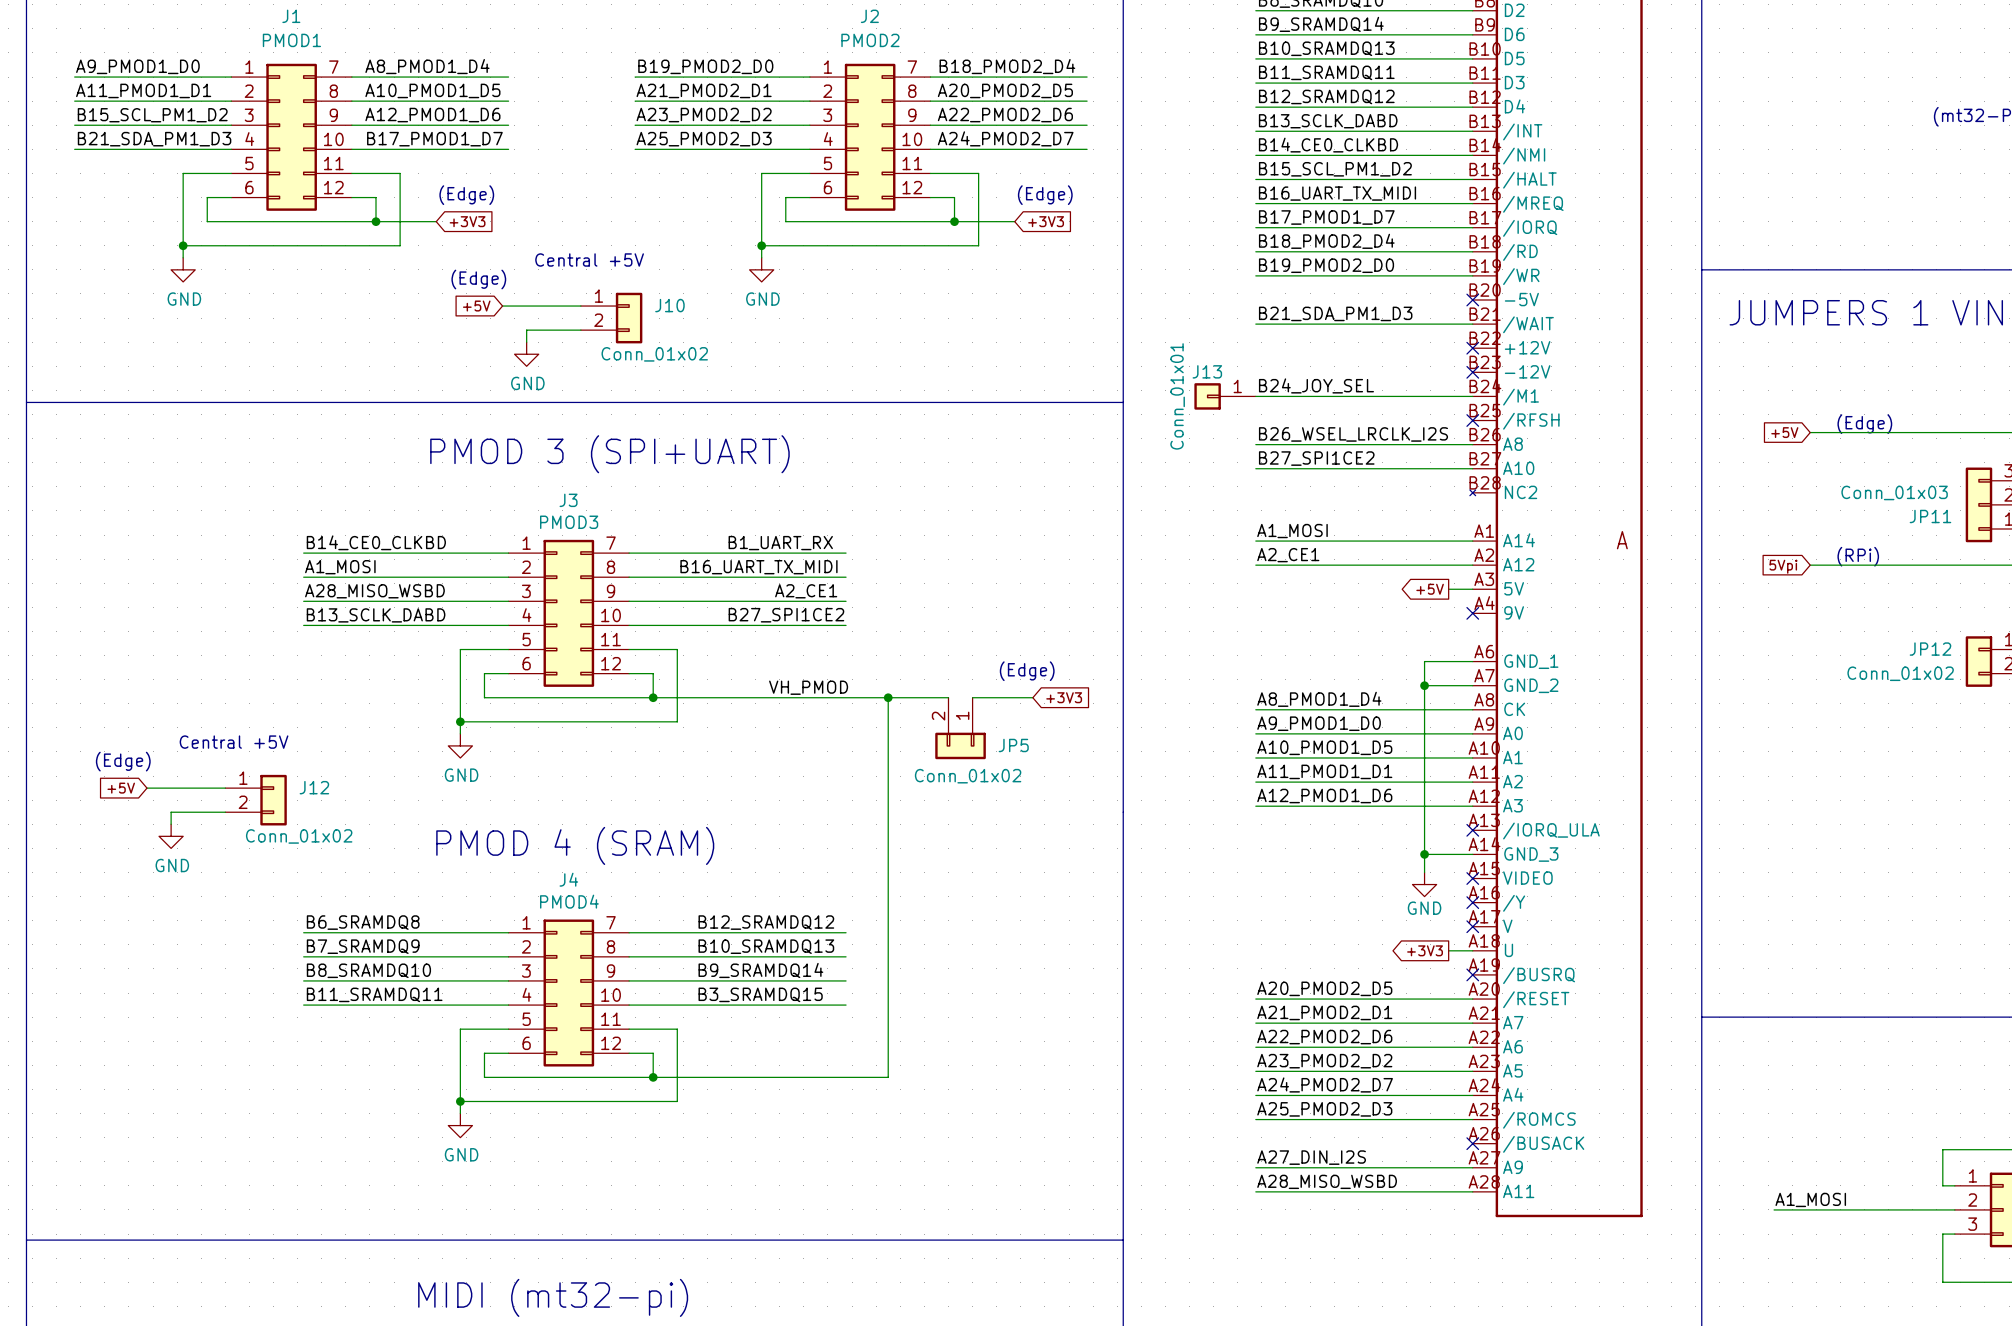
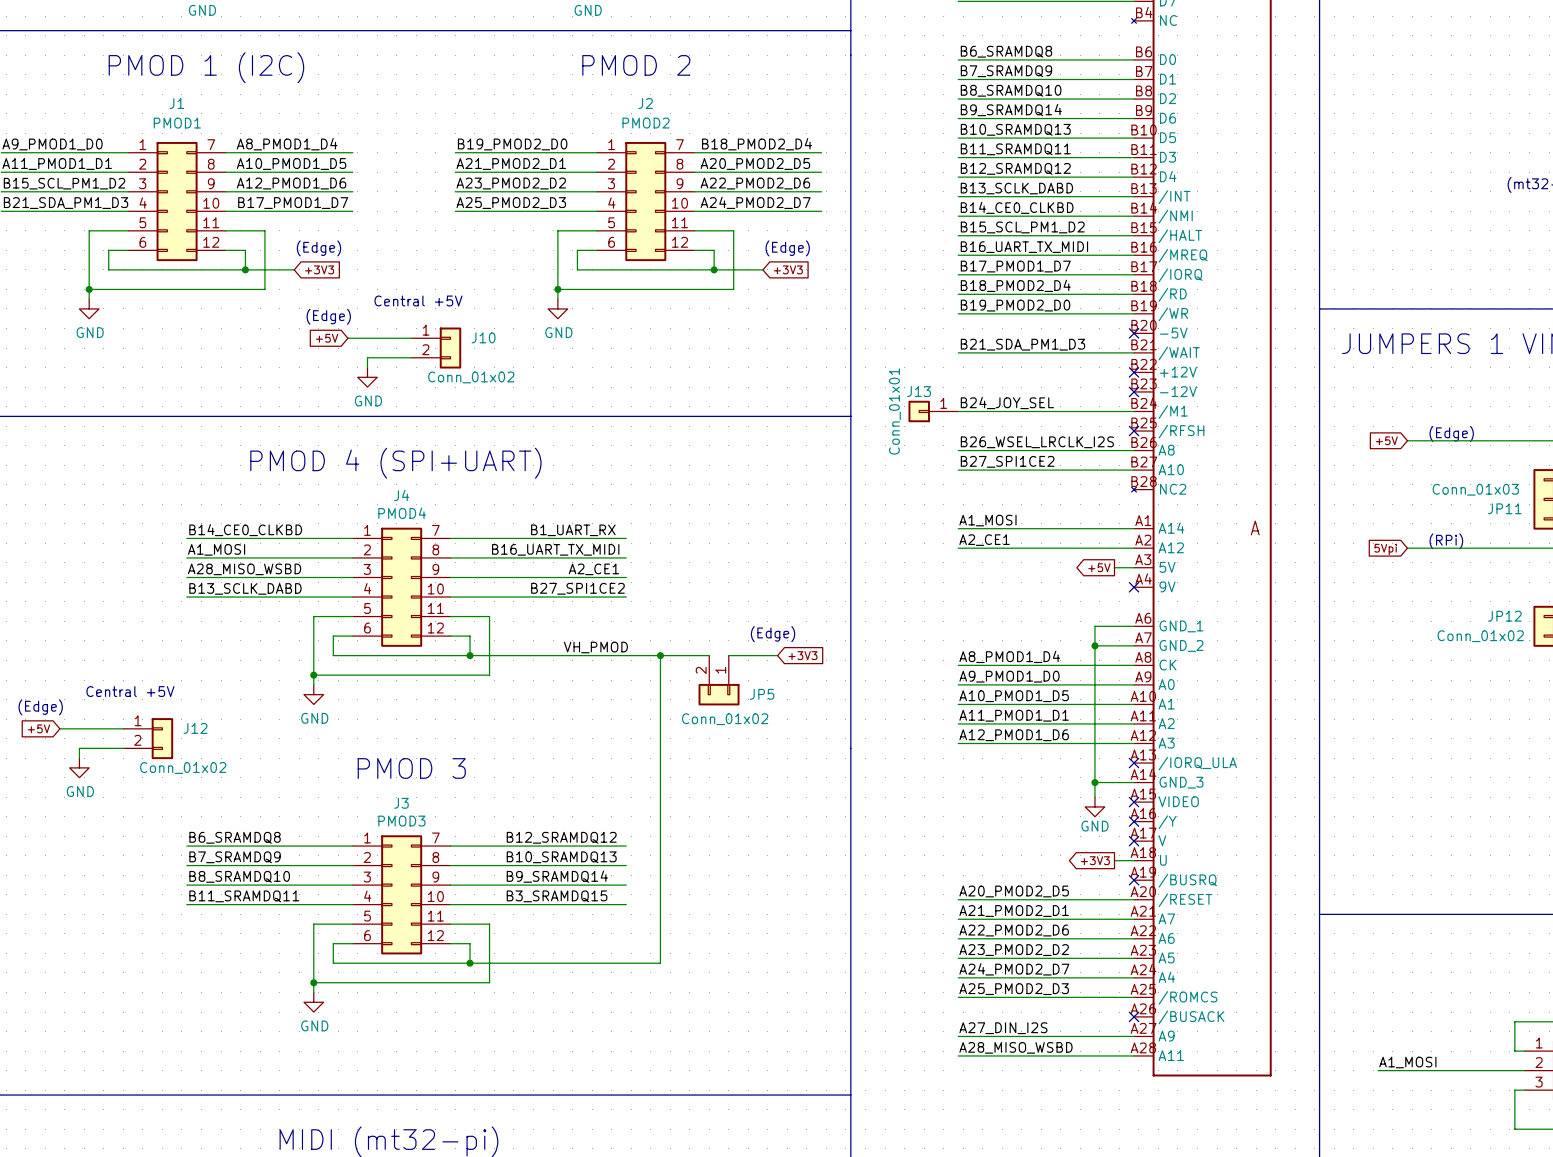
text: PMOD 3 (SPI+UART) (609, 454) -> PMOD 4 (SPI+UART) (395, 463)
J3 name: J3 (568, 500) -> J4 (401, 495)
J3 value: PMOD3 (569, 522) -> PMOD4 (402, 513)
text: none -> PMOD 3 (411, 768)
text: PMOD 4 (SRAM) (575, 845) -> none
J4 name: J4 (568, 879) -> J3 (401, 803)
J4 value: PMOD4 (569, 901) -> PMOD3 (401, 821)

